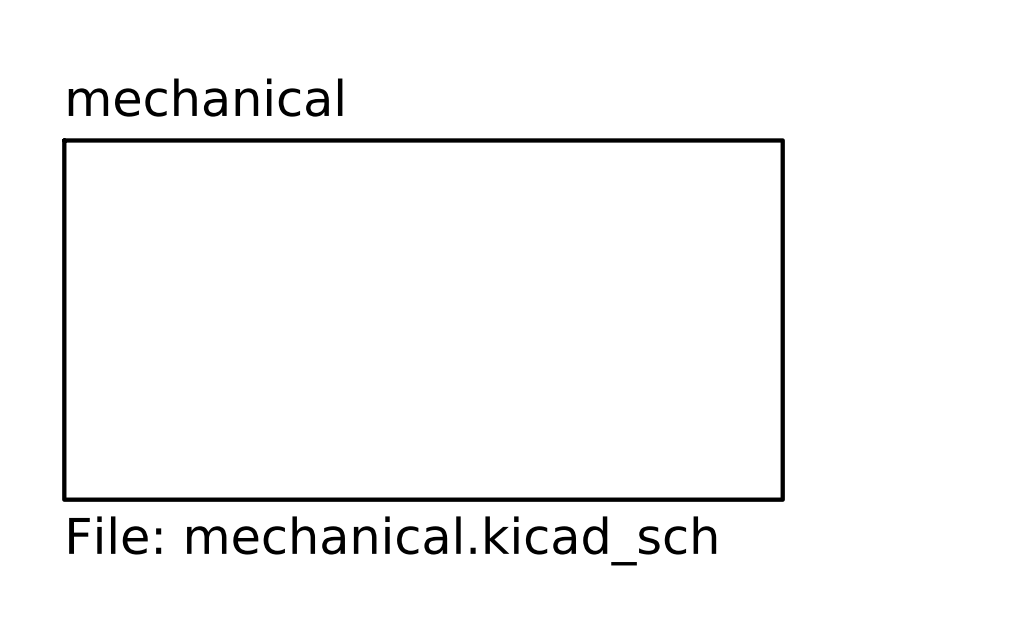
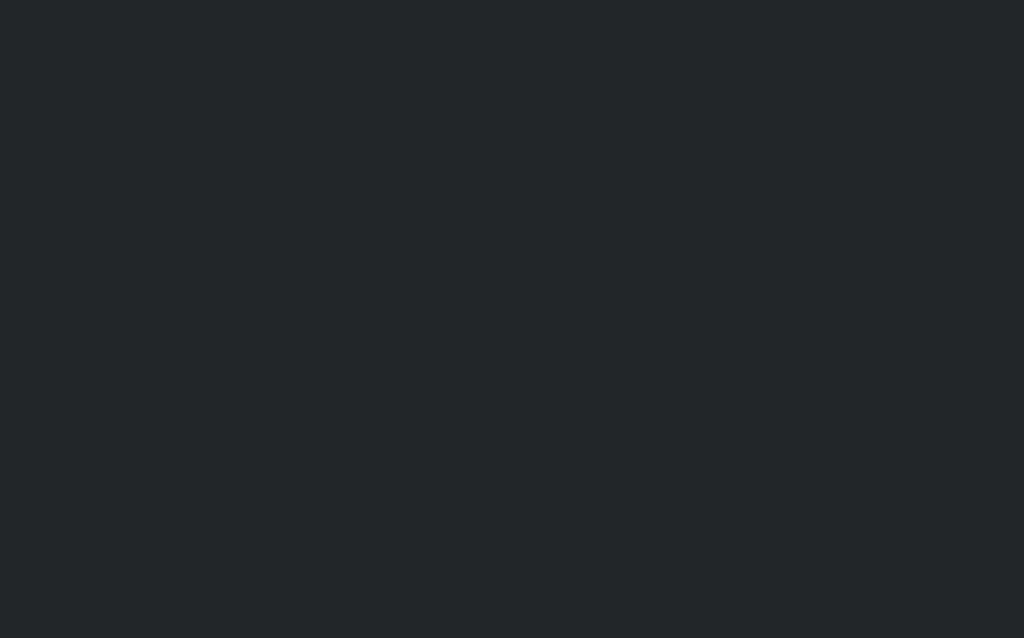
sheet mechanical: File: mechanical.kicad_sch (423, 320) -> none

